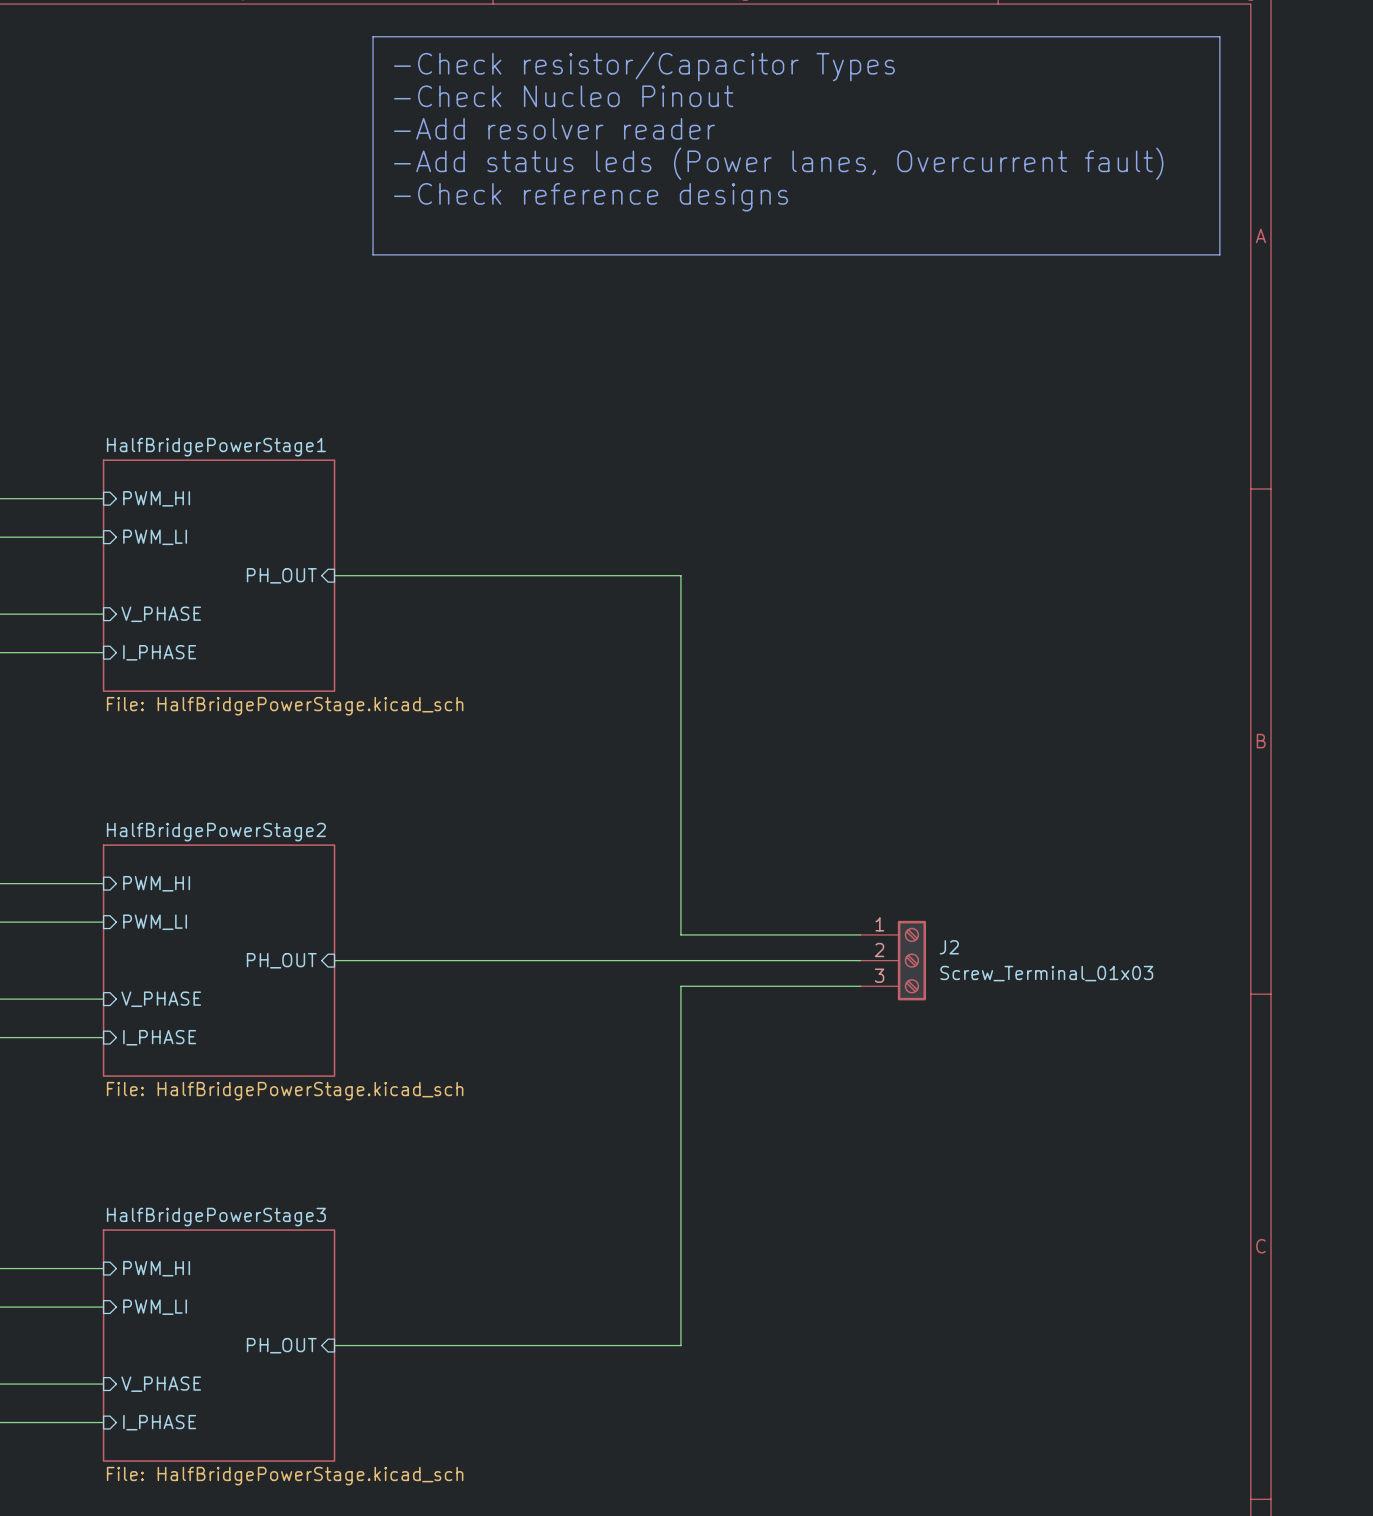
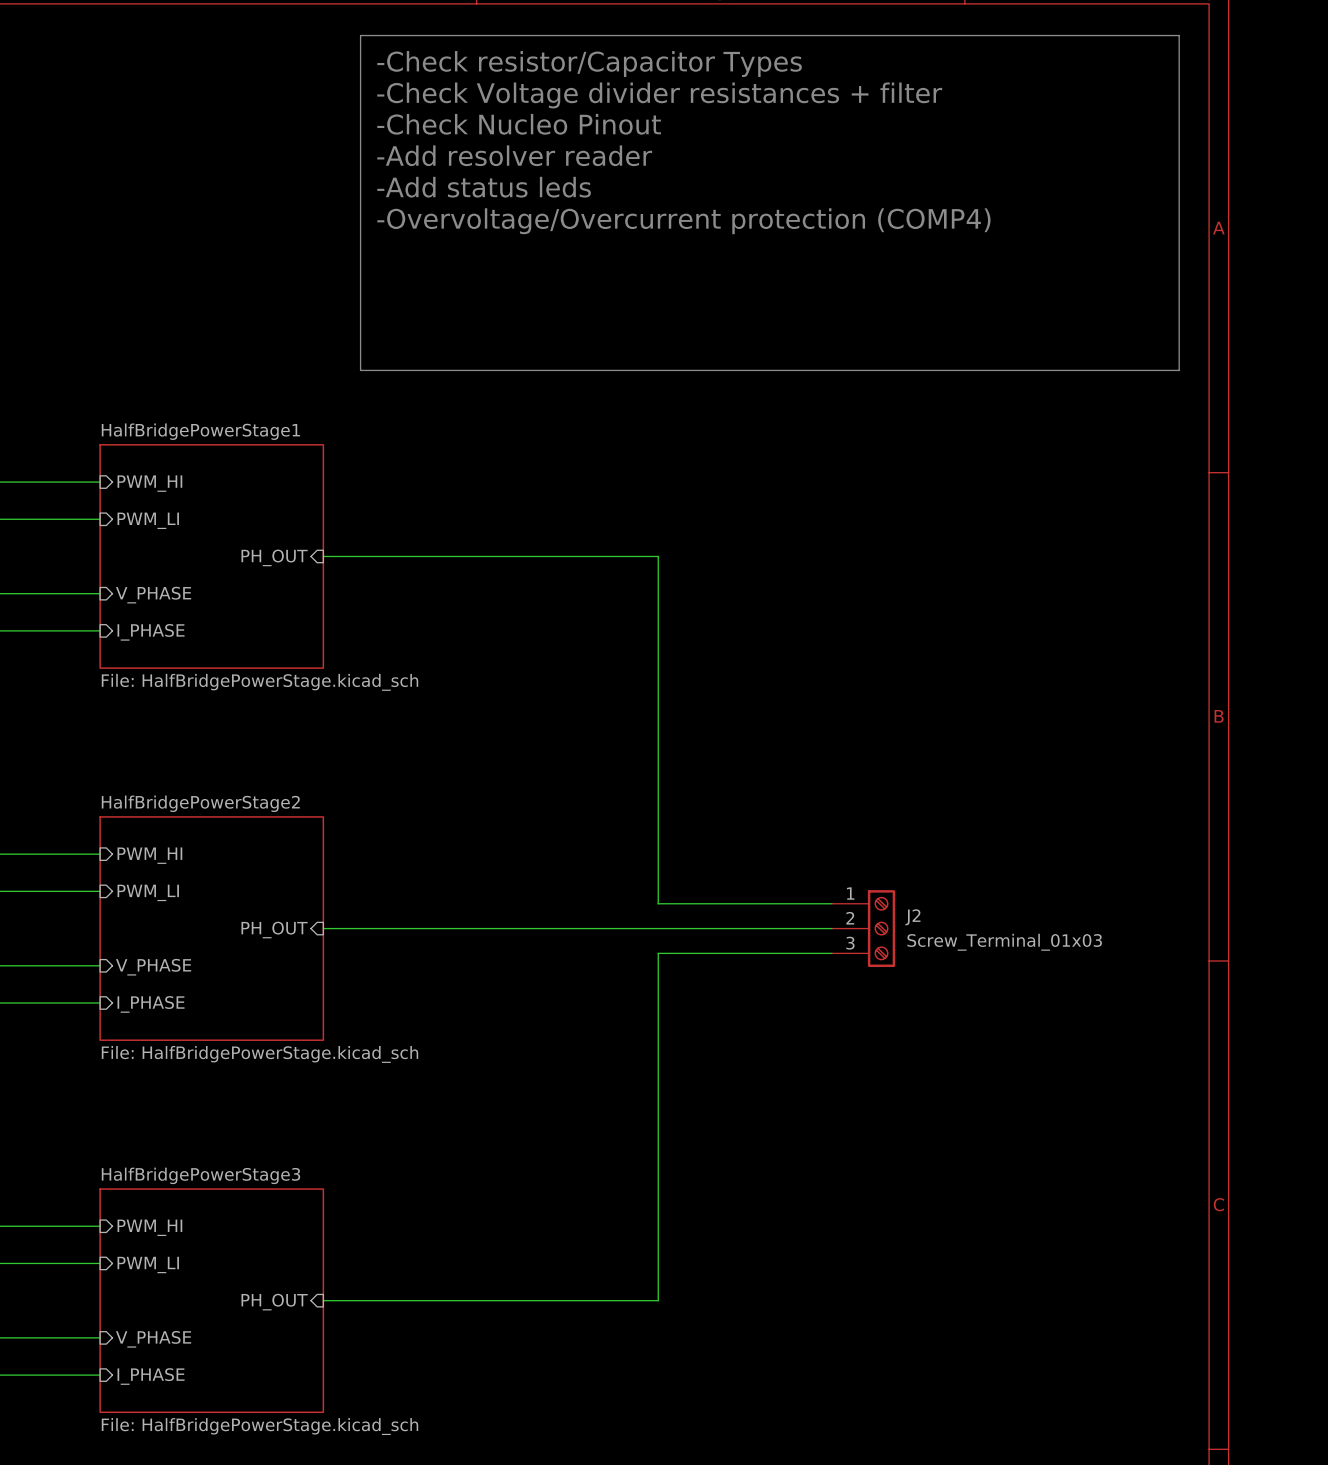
text: -Check Nucleo Pinout (563, 96) -> -Check Voltage divider resistances + filter (659, 95)
text: -Add resolver reader (554, 128) -> -Check Nucleo Pinout (519, 124)
text: -Add status leds (Power lanes, Overcurrent fault) (778, 163) -> -Add resolver reader (514, 155)
text: -Check reference designs (591, 197) -> -Add status leds (484, 187)
text: none -> -Overvoltage/Overcurrent protection (COMP4) (683, 221)
line: (373, 254) (1219, 254) -> (360, 246) (360, 370) (1179, 370) (1179, 246)

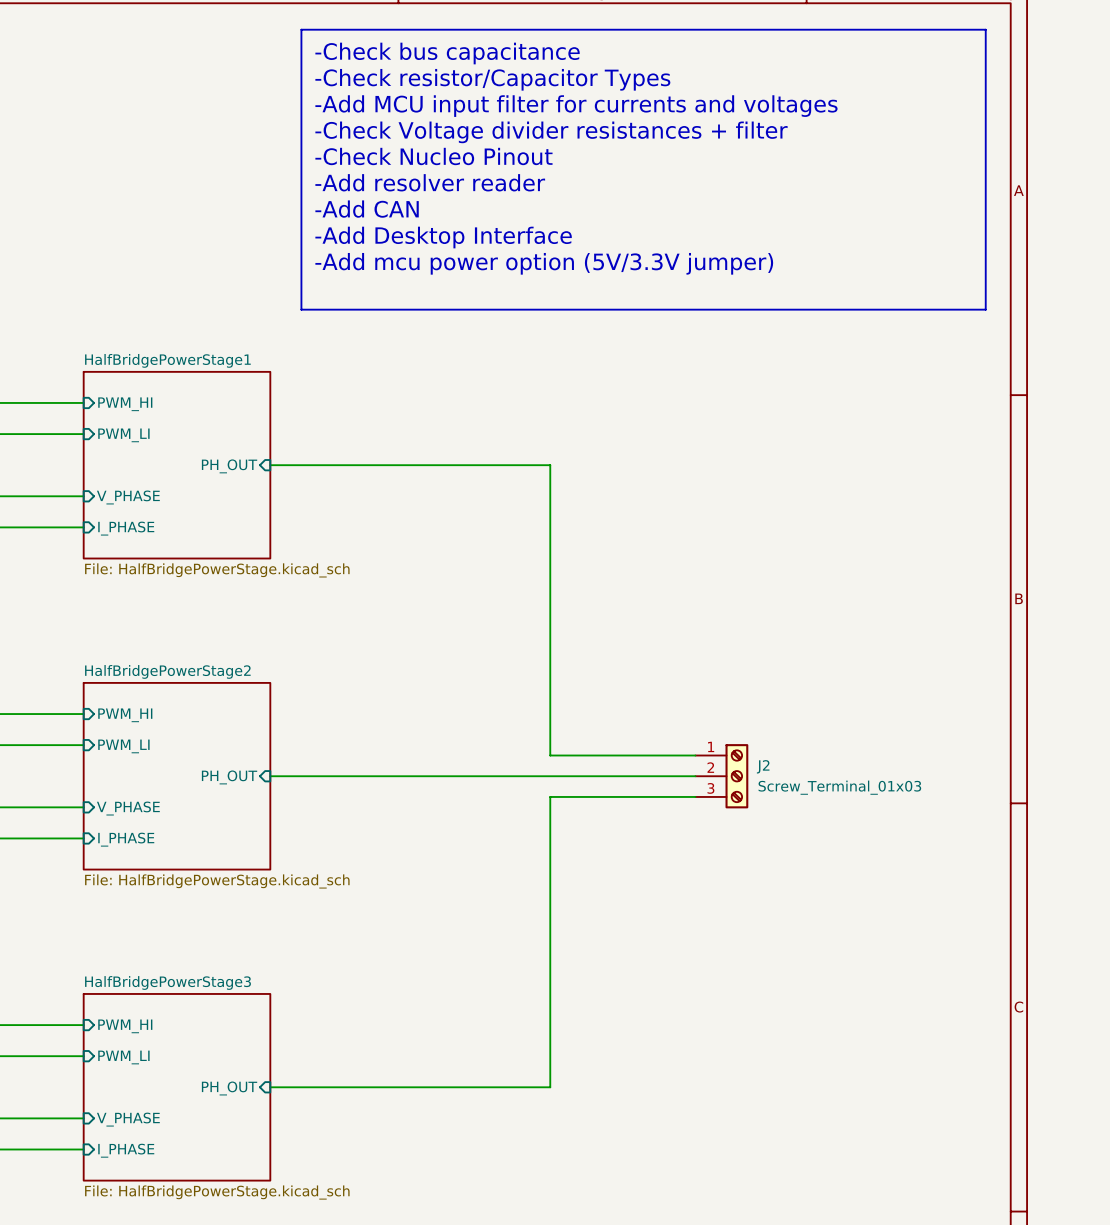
text: -Check resistor/Capacitor Types (589, 64) -> -Check bus capacitance (447, 53)
text: -Check Voltage divider resistances + filter (659, 95) -> -Check resistor/Capacitor Types (492, 79)
text: -Check Nucleo Pinout (519, 124) -> -Add MCU input filter for currents and voltages (576, 106)
text: -Add resolver reader (514, 155) -> -Check Voltage divider resistances + filter (551, 132)
text: -Add status leds (484, 187) -> -Check Nucleo Pinout (433, 156)
text: -Overvoltage/Overcurrent protection (COMP4) (683, 221) -> -Add resolver reader (430, 182)
text: none -> -Add CAN (367, 209)
text: none -> -Add Desktop Interface (443, 237)
text: none -> -Add mcu power option (5V/3.3V jumper) (544, 263)

